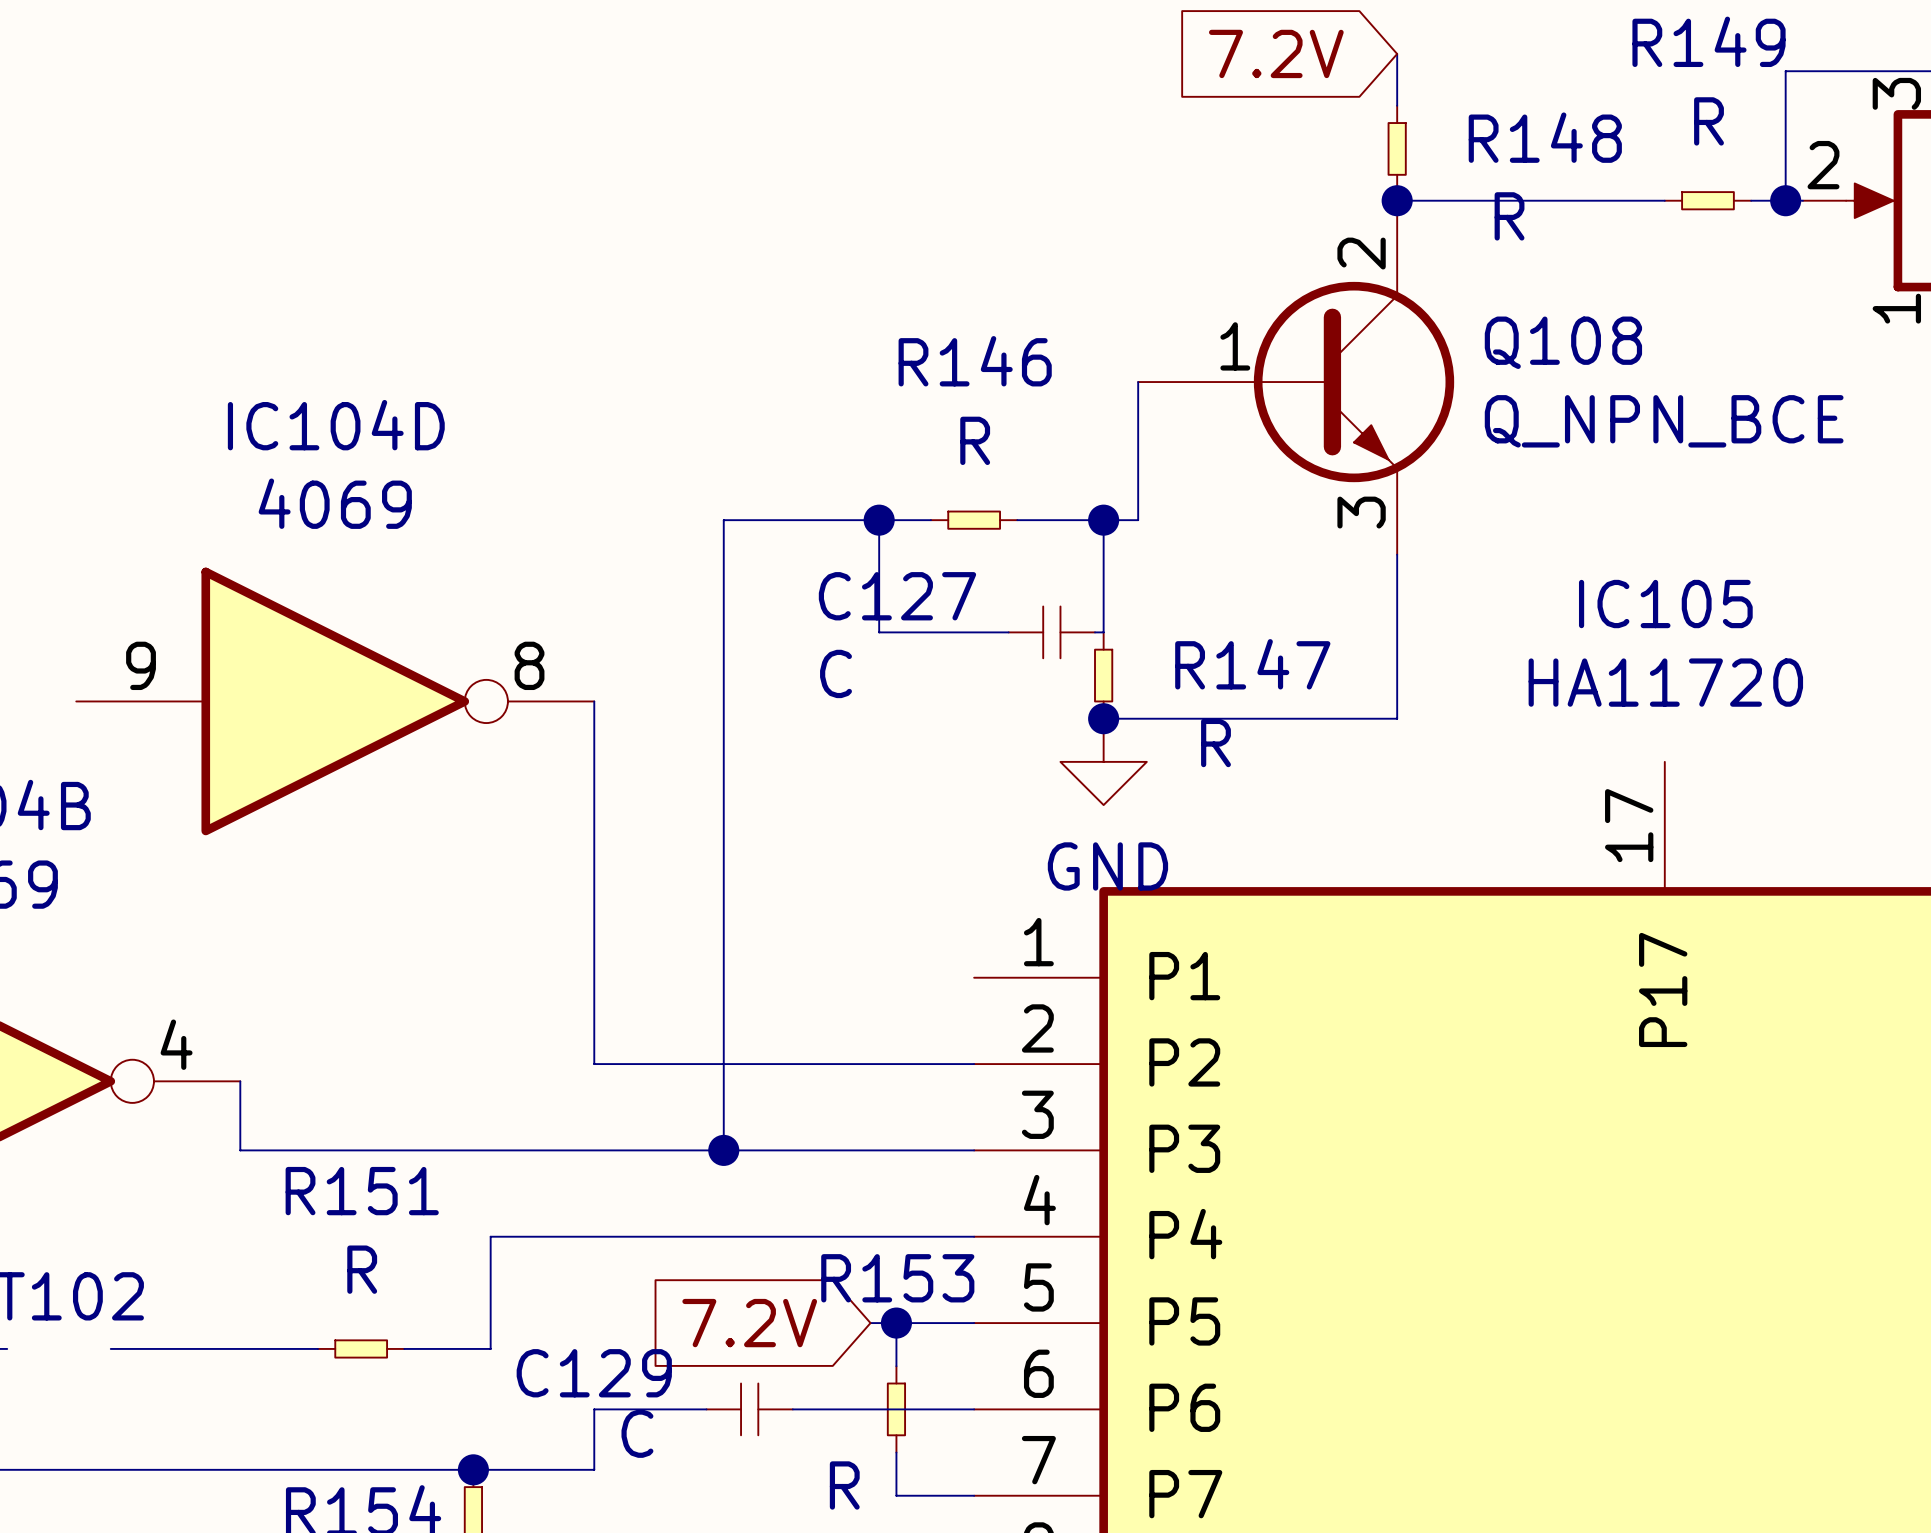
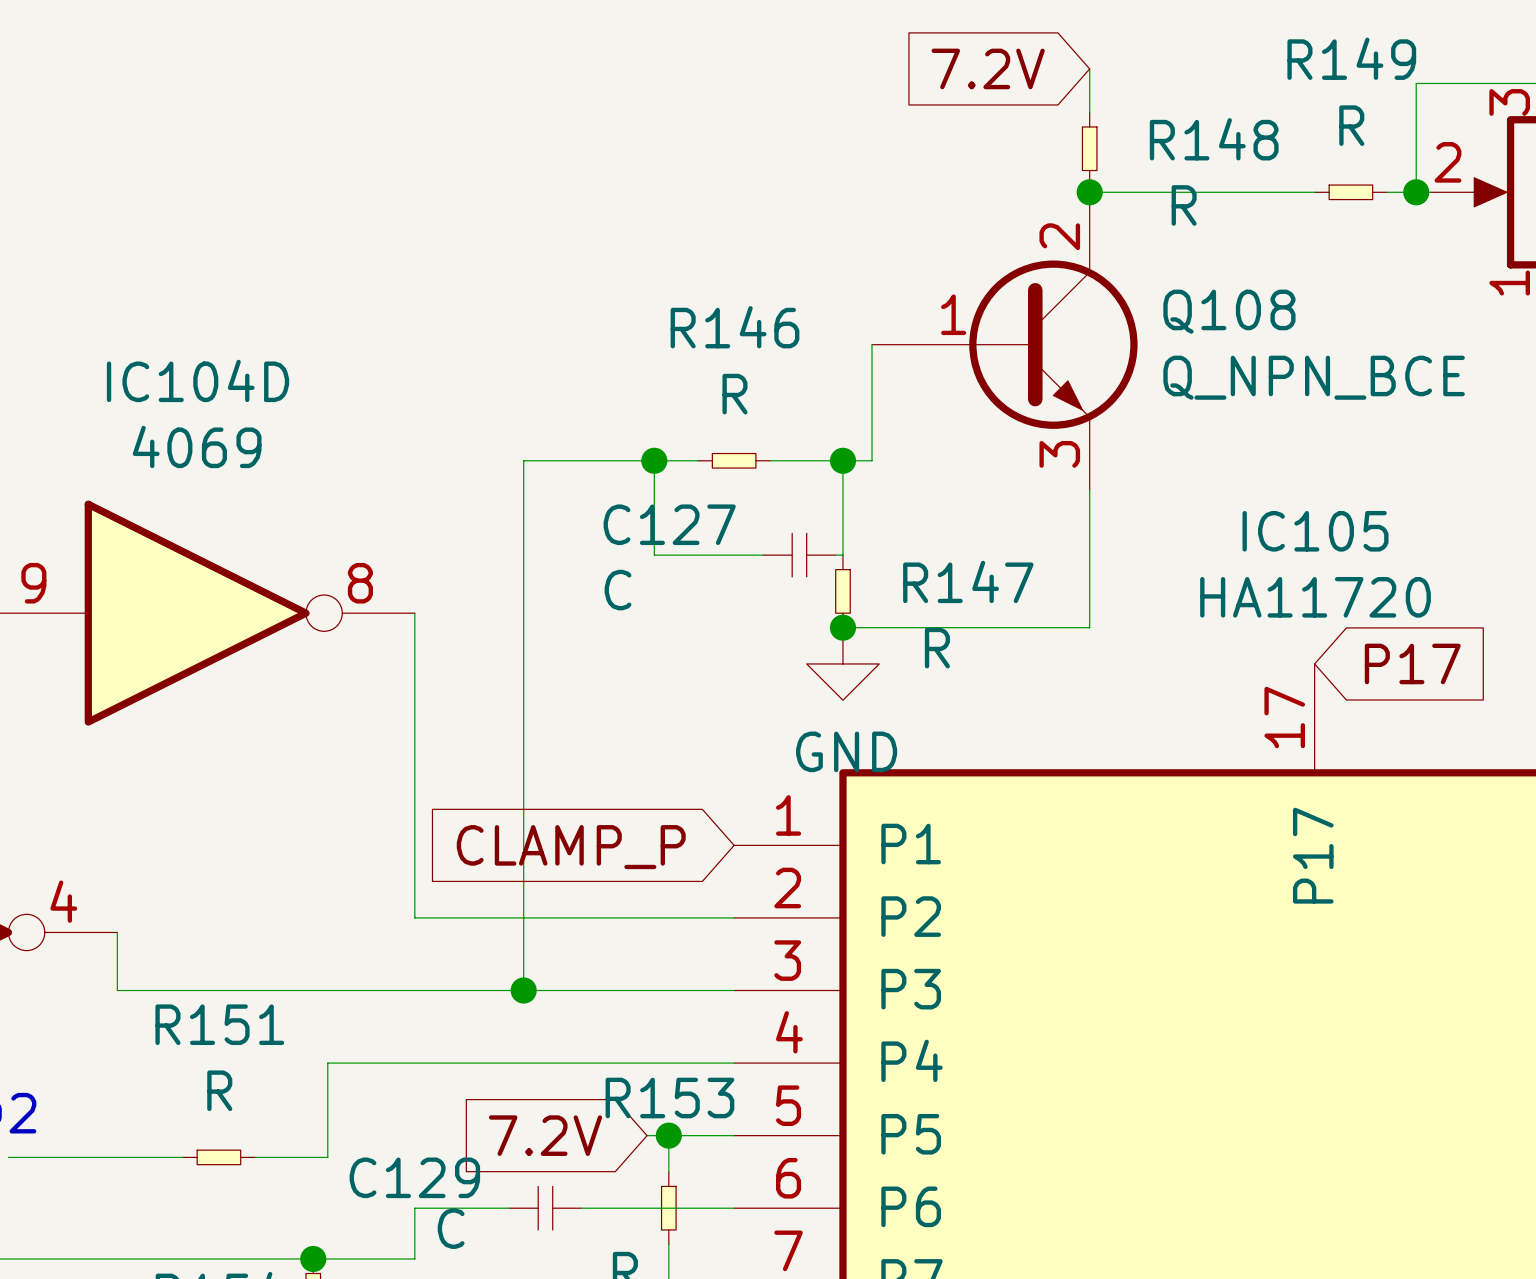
global label: none -> P17 (1412, 663)
global label: none -> CLAMP_P (571, 847)

